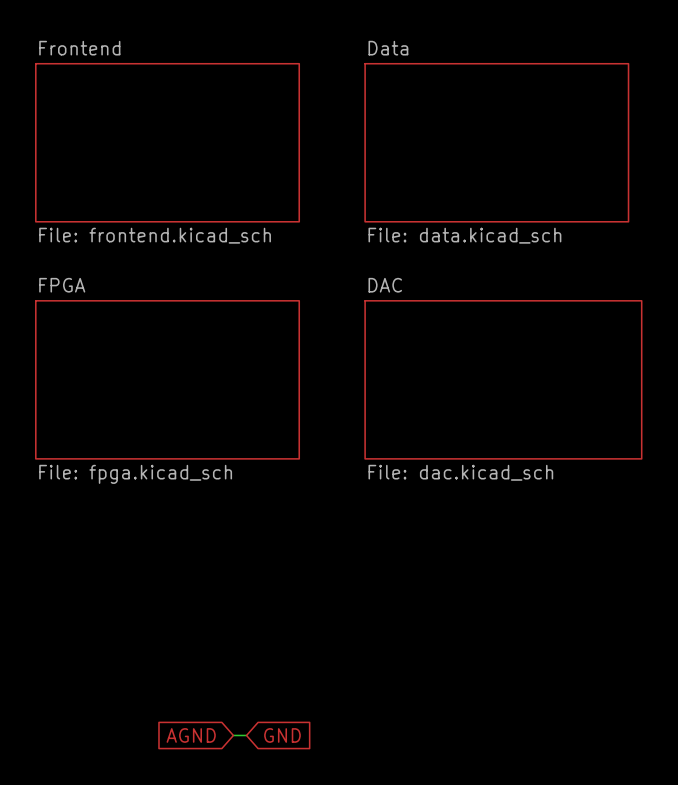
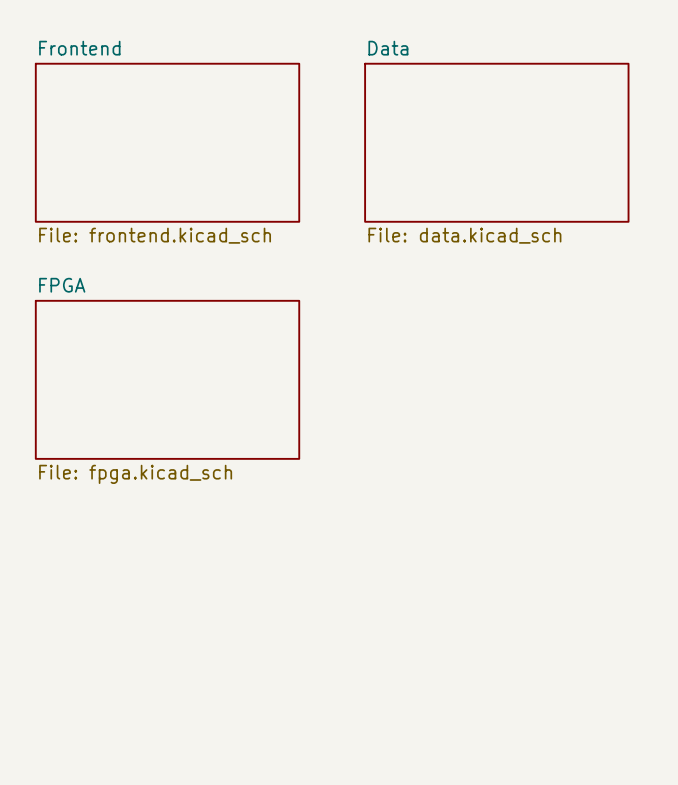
sheet DAC: File: dac.kicad_sch (503, 379) -> none
global label: AGND (191, 735) -> none
wire: (233, 735) (246, 735) -> none
global label: GND (282, 735) -> none

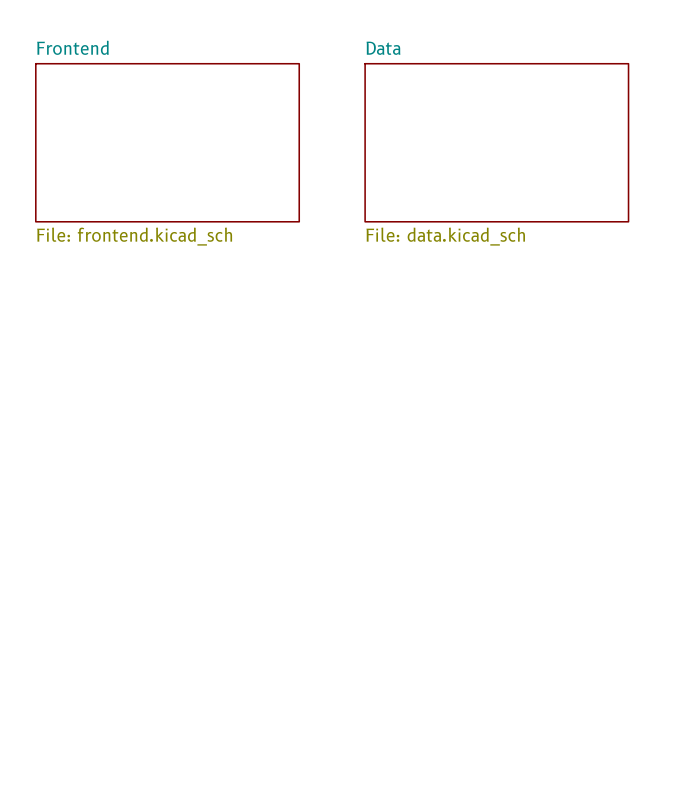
sheet FPGA: File: fpga.kicad_sch (167, 379) -> none

